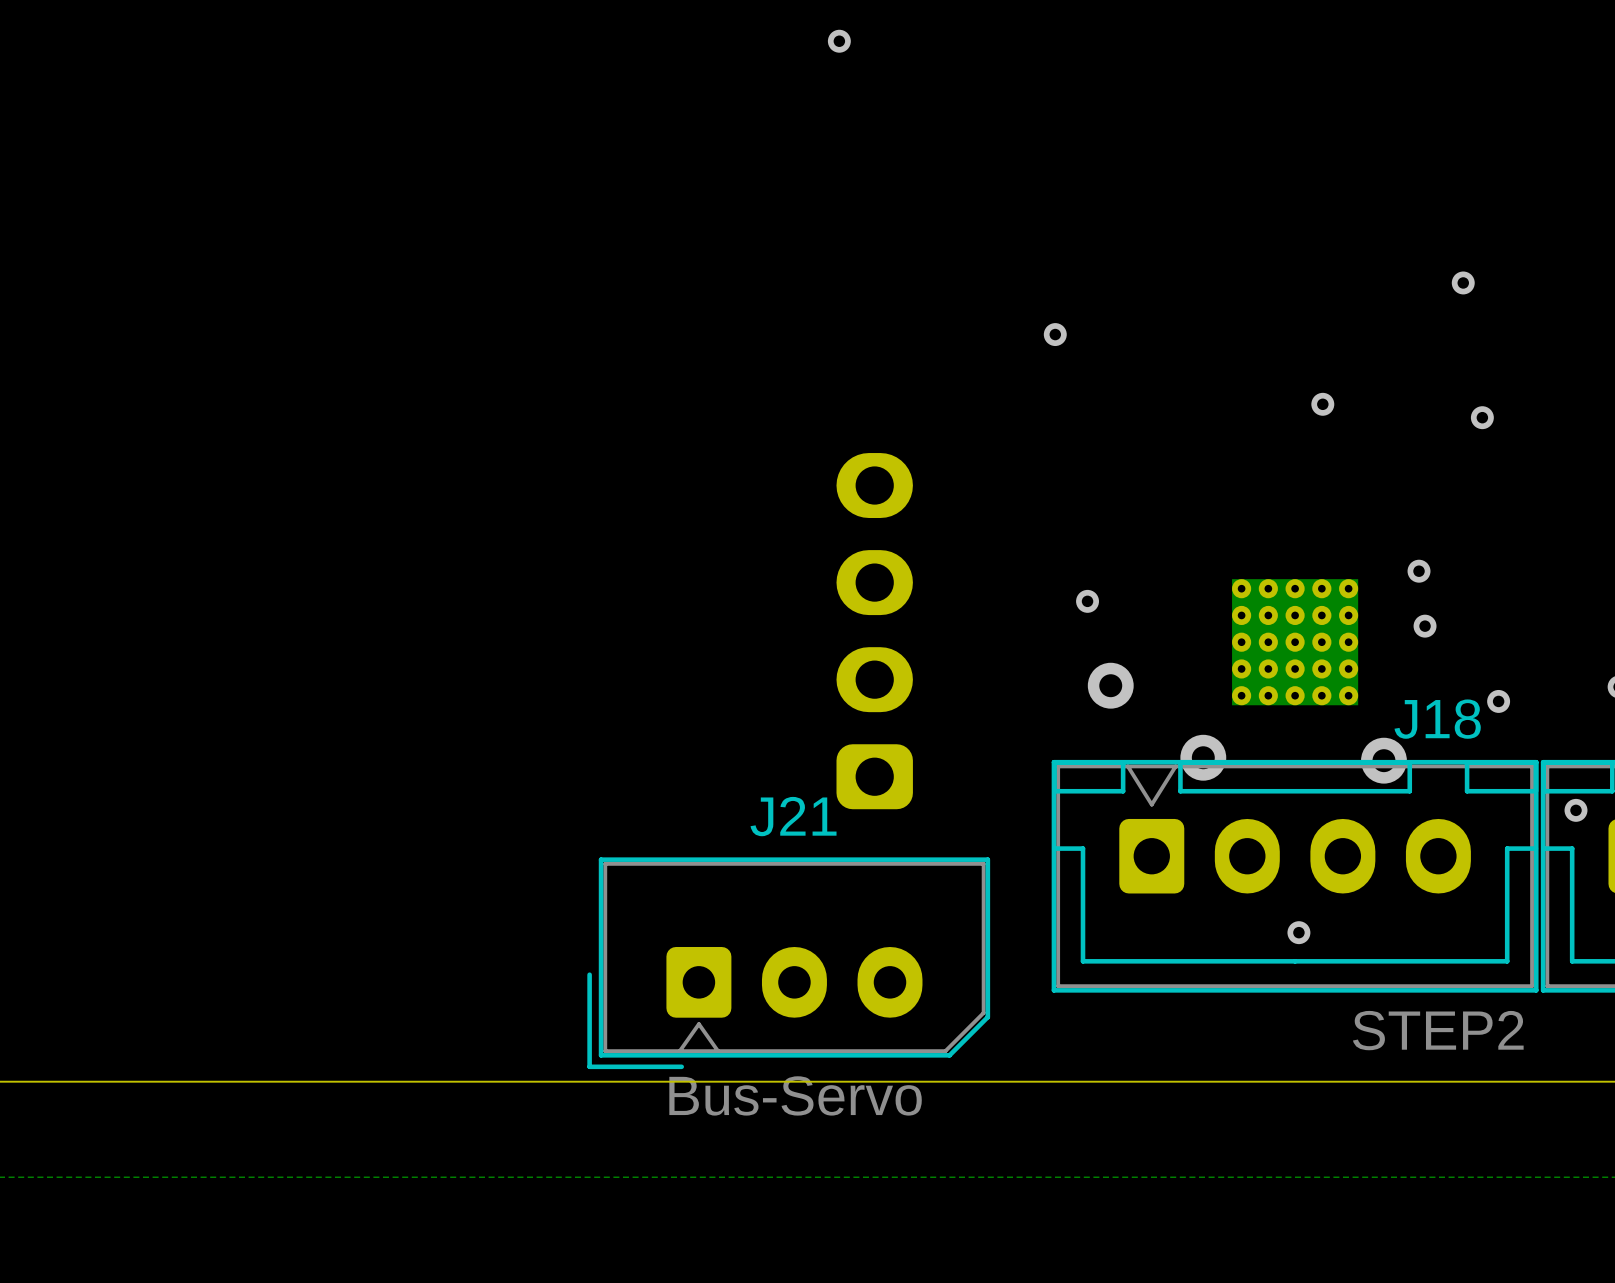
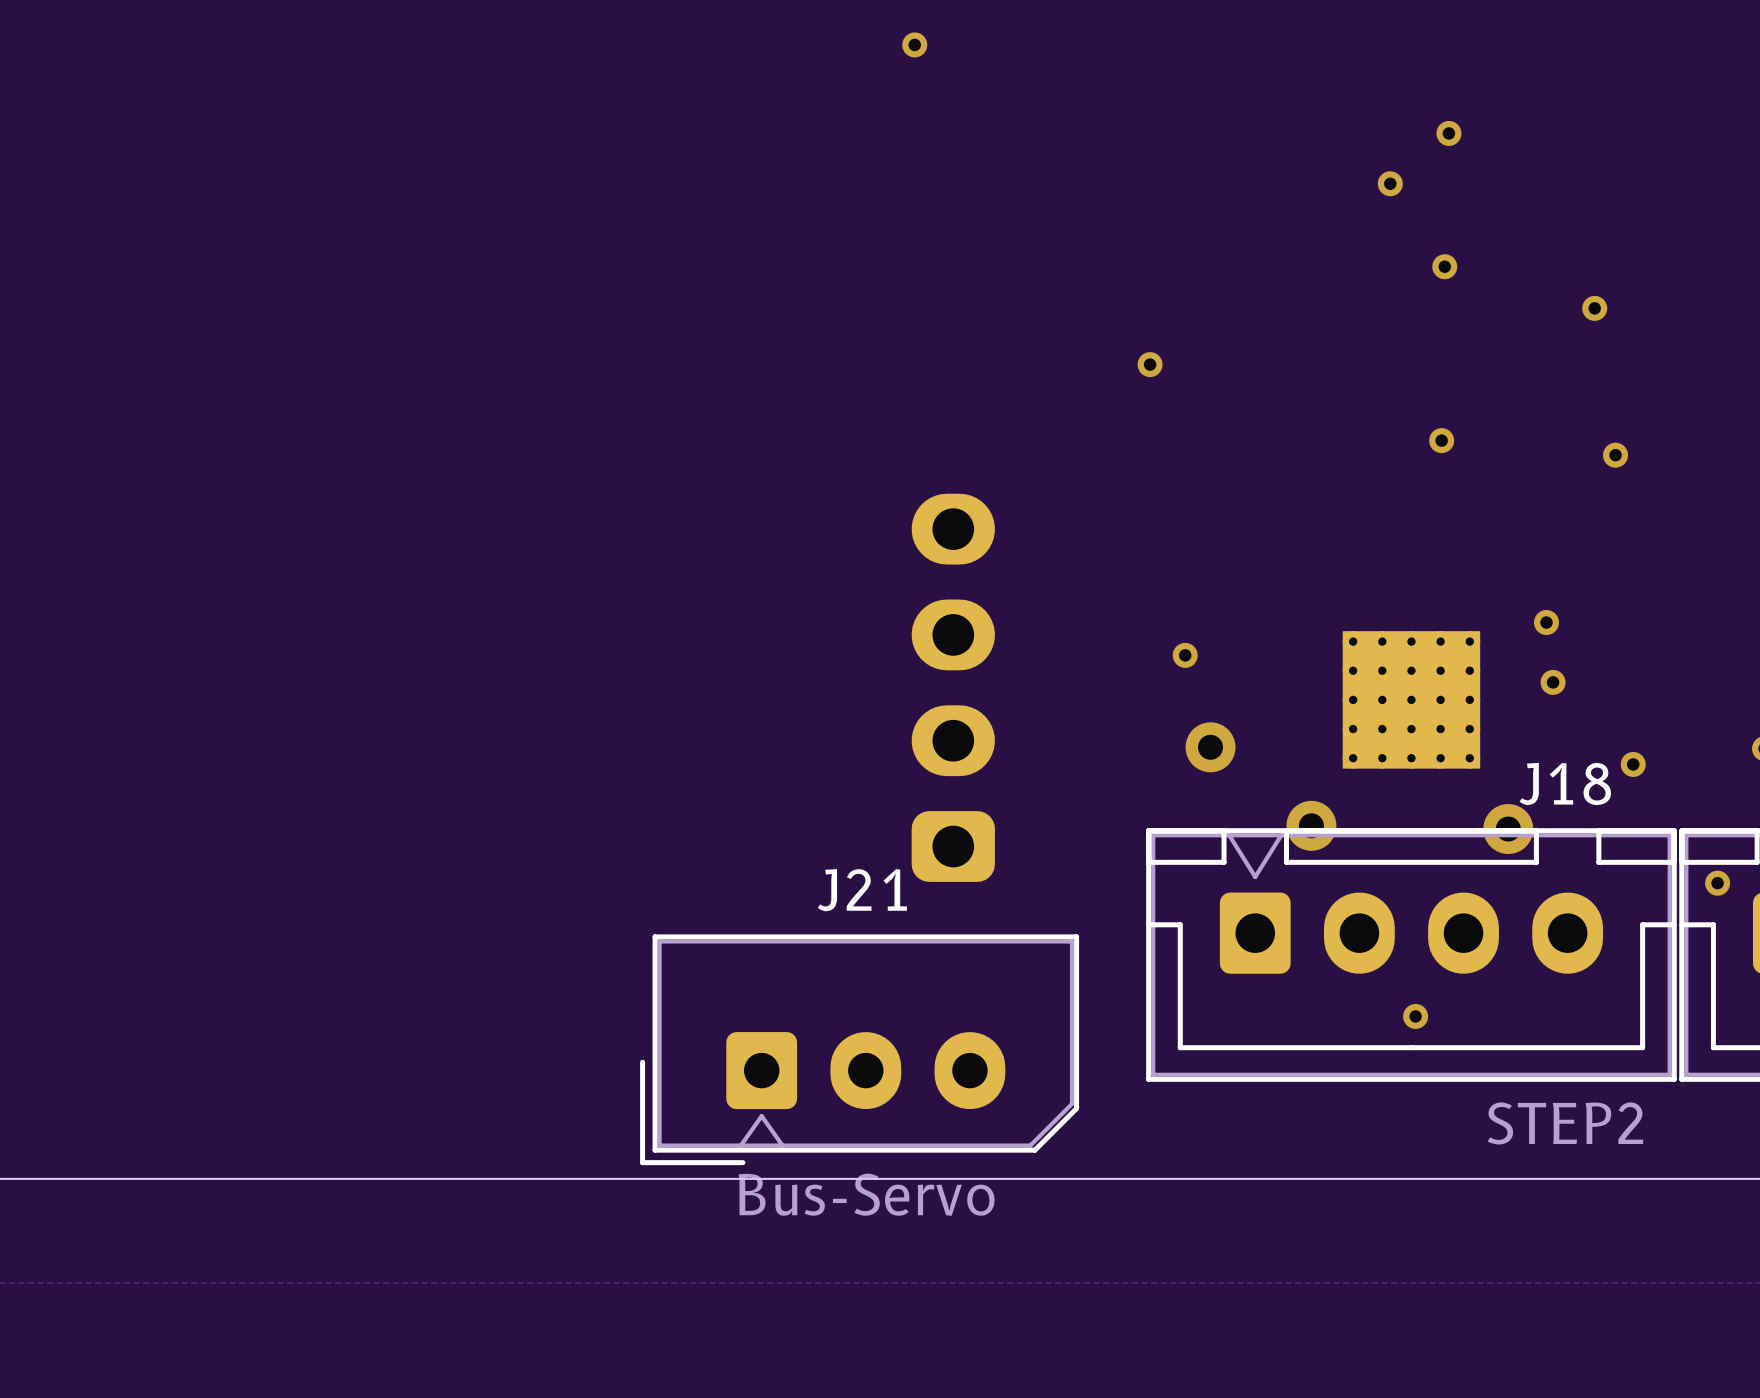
via: none -> (1448, 133)
via: none -> (1390, 183)
via: none -> (1444, 266)

